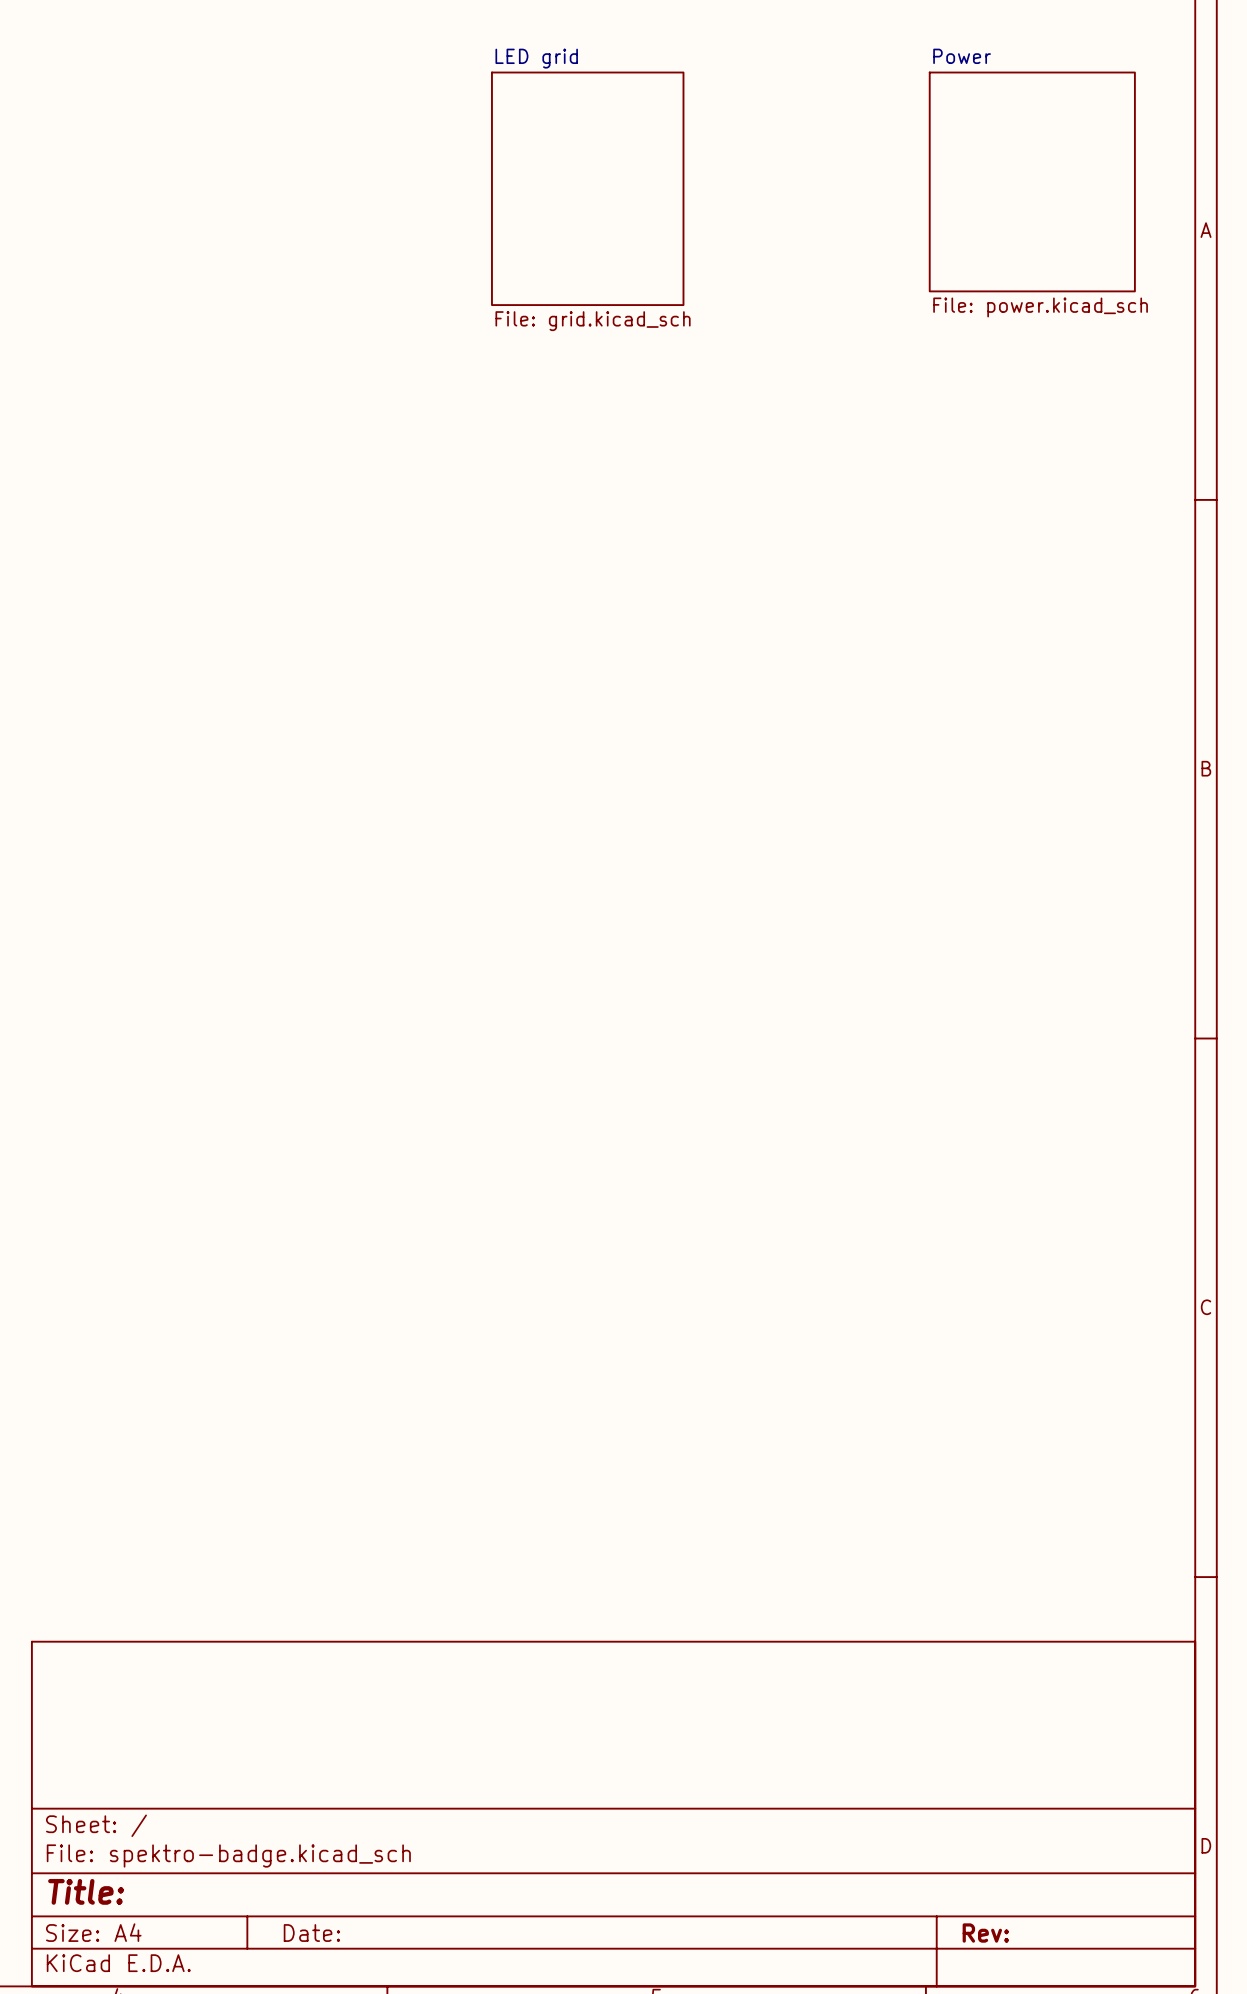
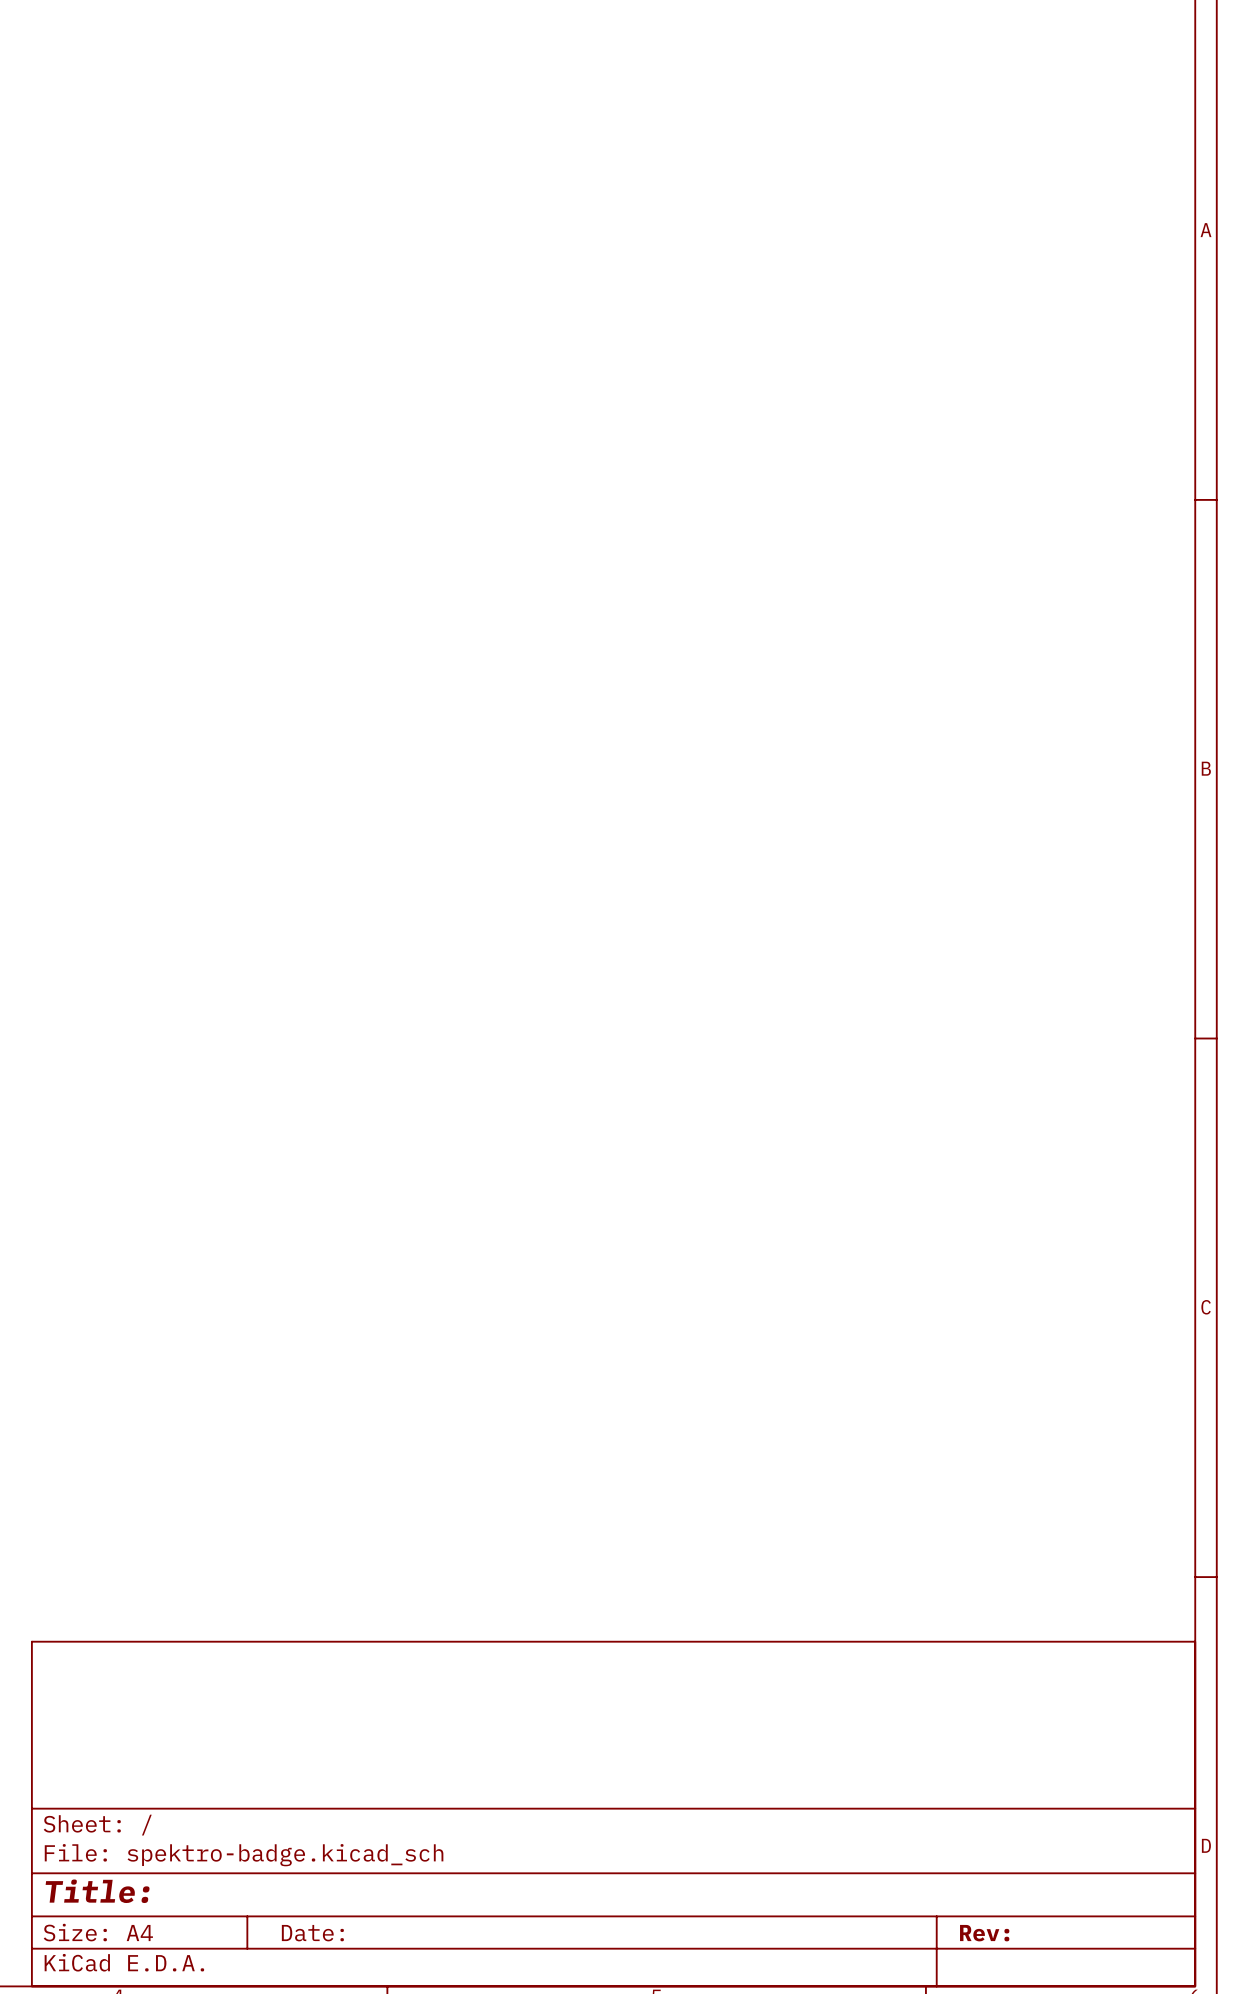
sheet Power: File: power.kicad_sch (1032, 181) -> none
sheet LED grid: File: grid.kicad_sch (587, 188) -> none

